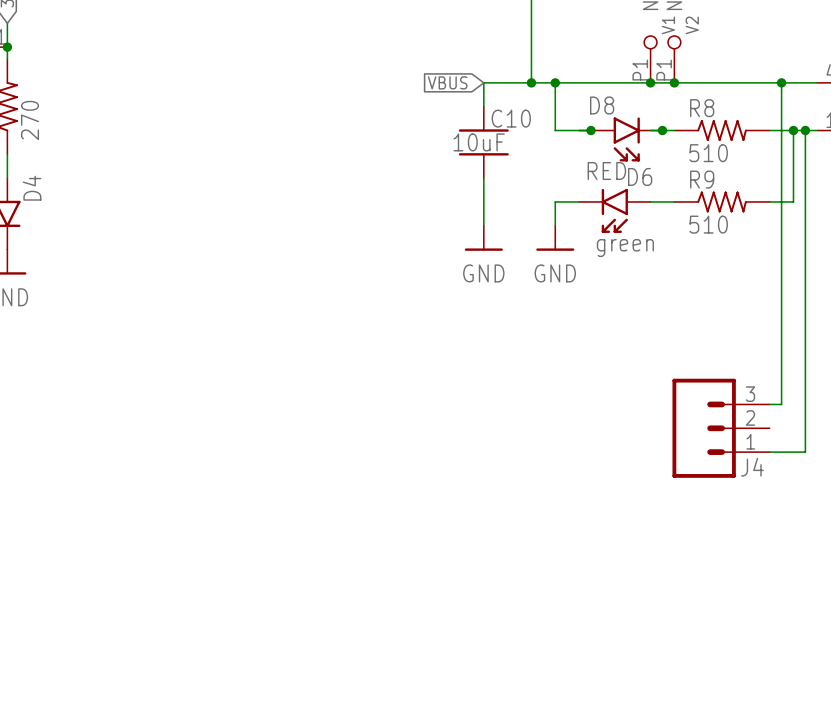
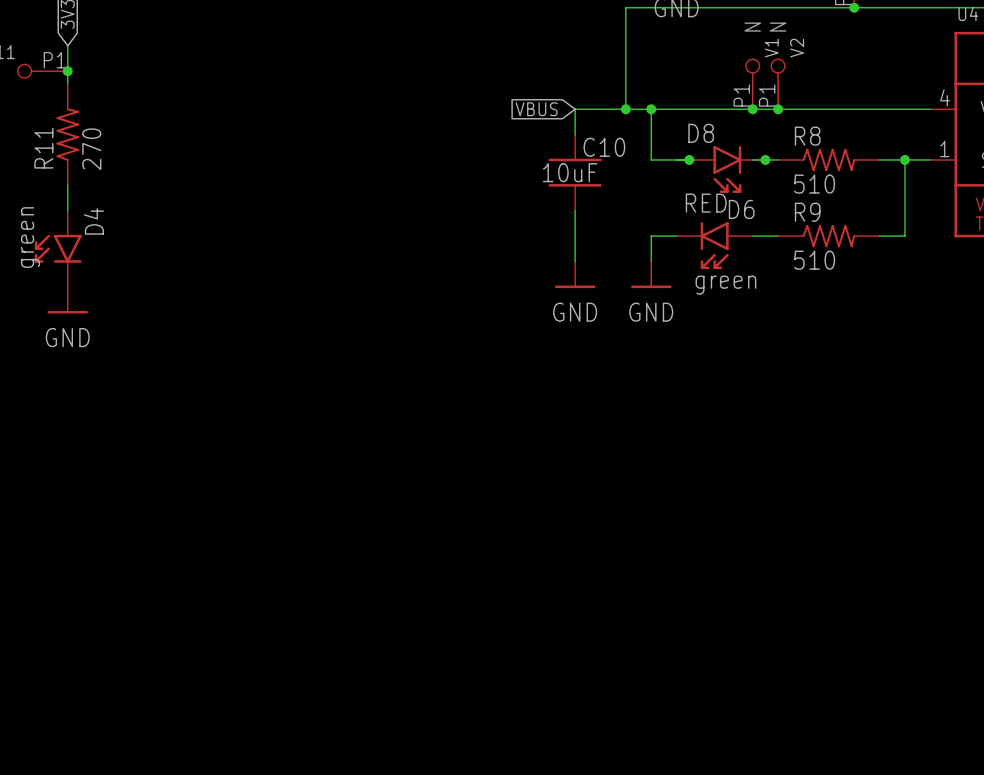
wire: (781, 82) (781, 404) (769, 404) -> none
junction: (781, 82) -> none
wire: (805, 130) (805, 452) (769, 452) -> none
junction: (805, 130) -> none
J4: (721, 428) -> none

